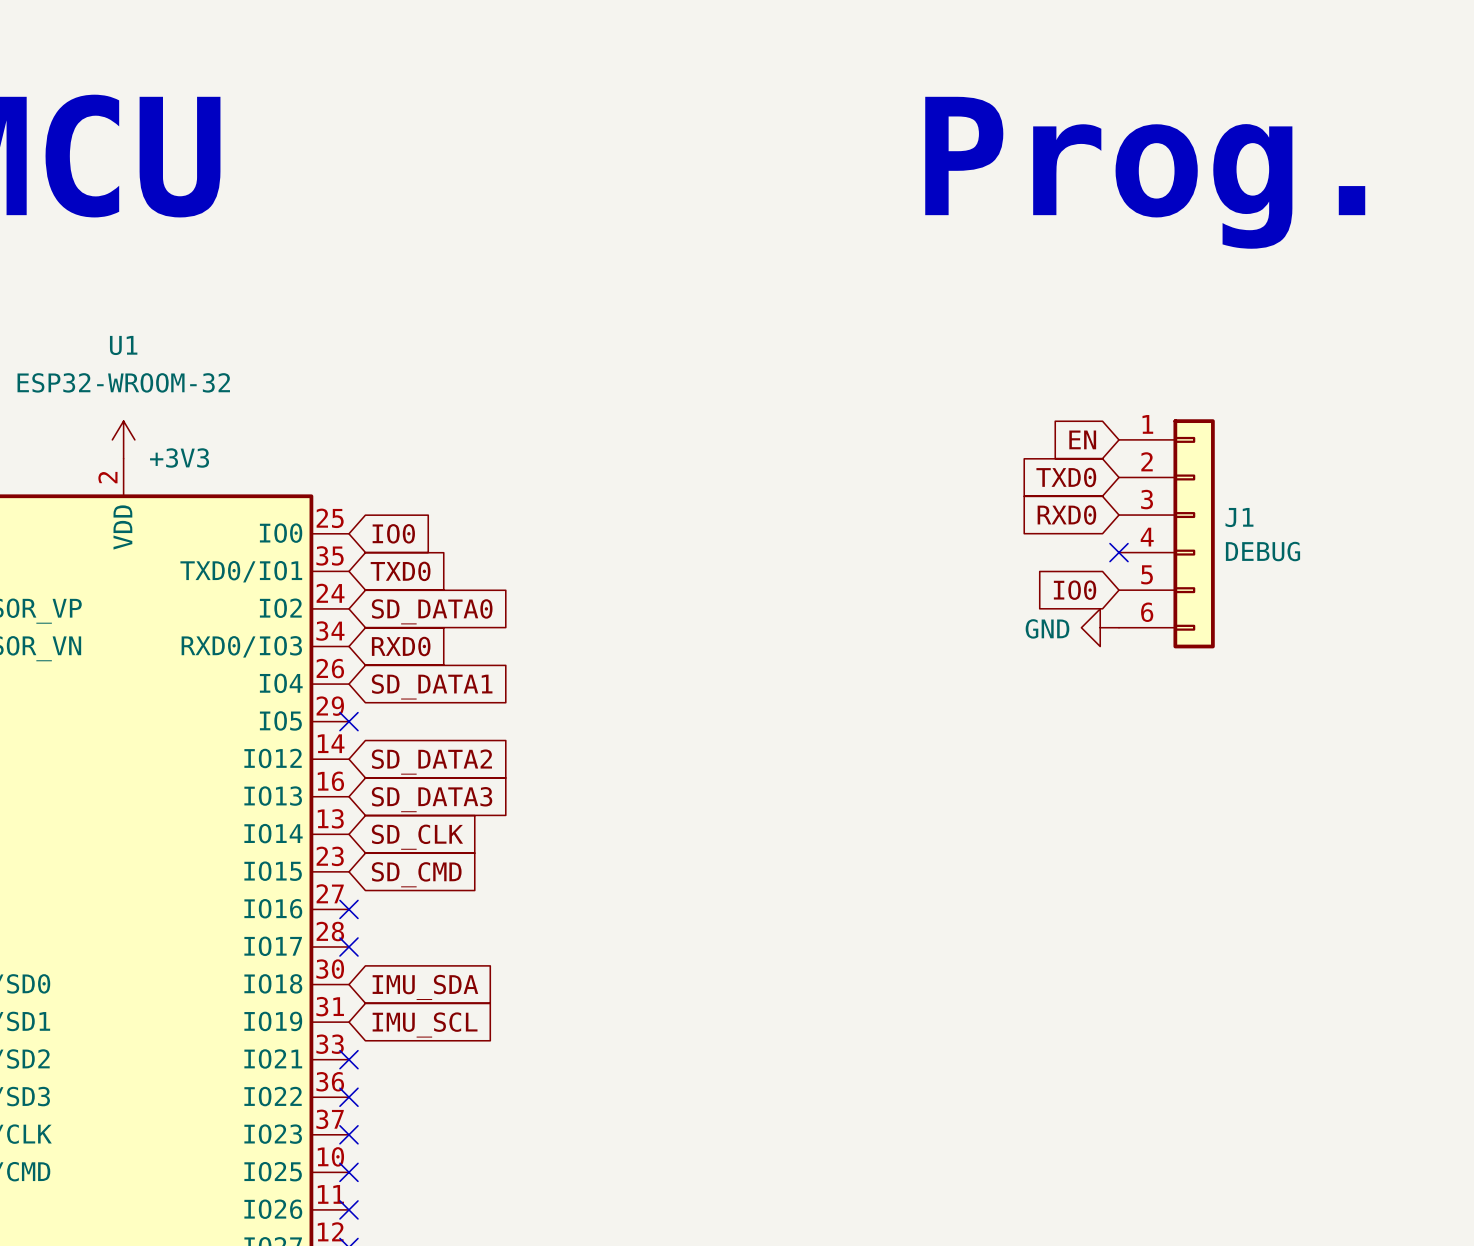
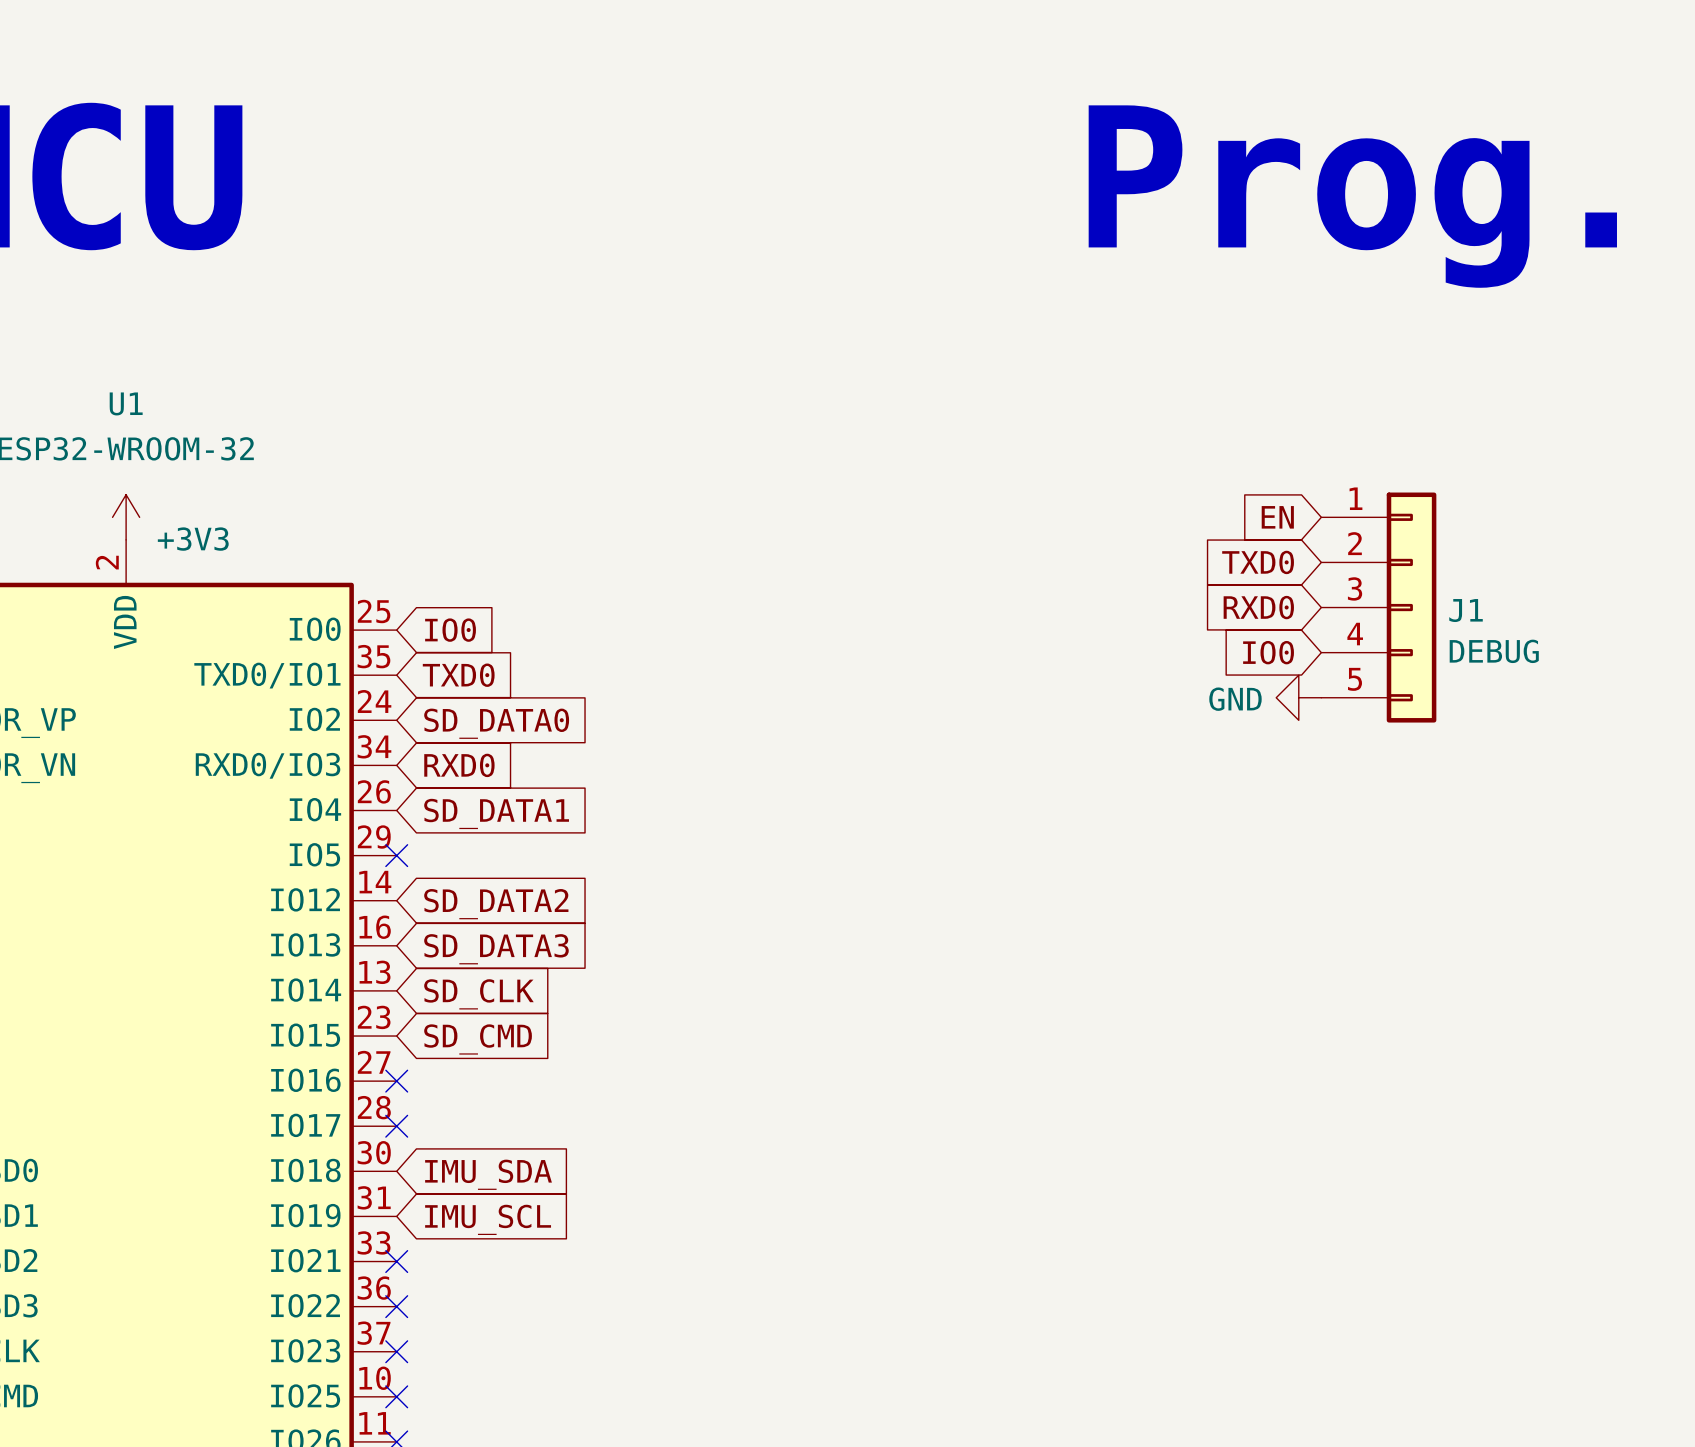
J1 symbol: [1119, 419, 1215, 649] -> [1321, 492, 1437, 723]
no-connect mark: (1119, 552) -> none
global label position: IO0 (1075, 590) -> IO0 (1268, 652)
power symbol position: GND (1100, 627) -> GND (1298, 697)

